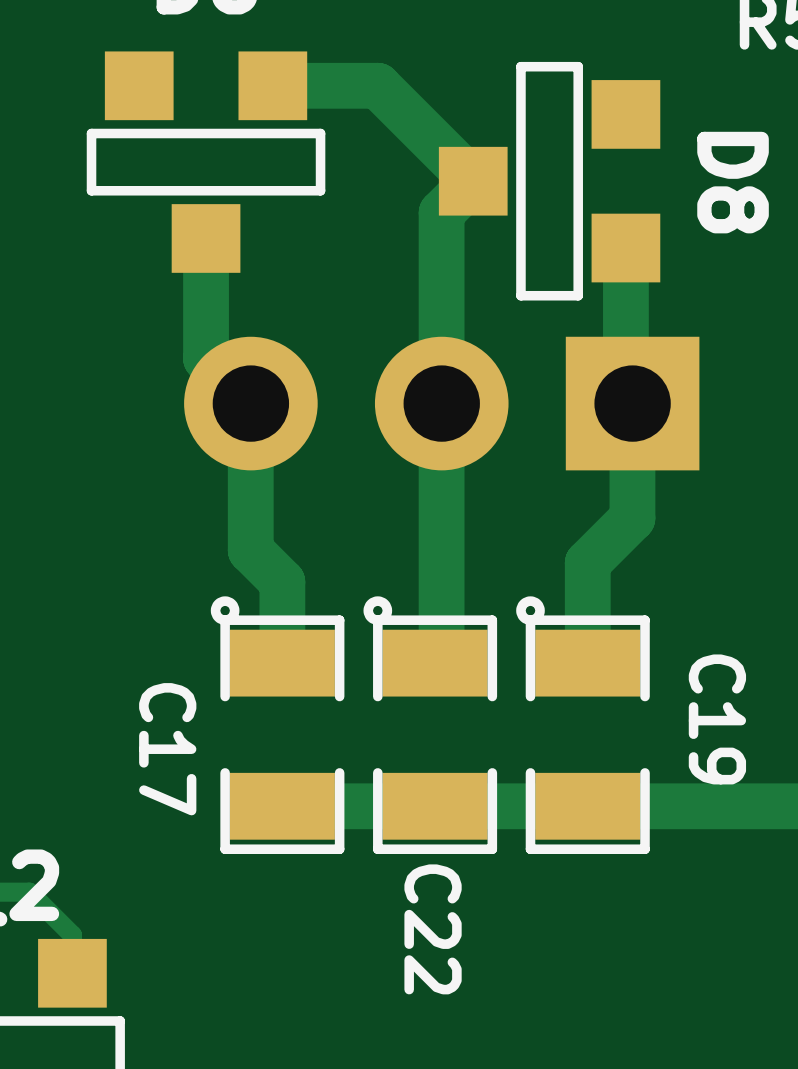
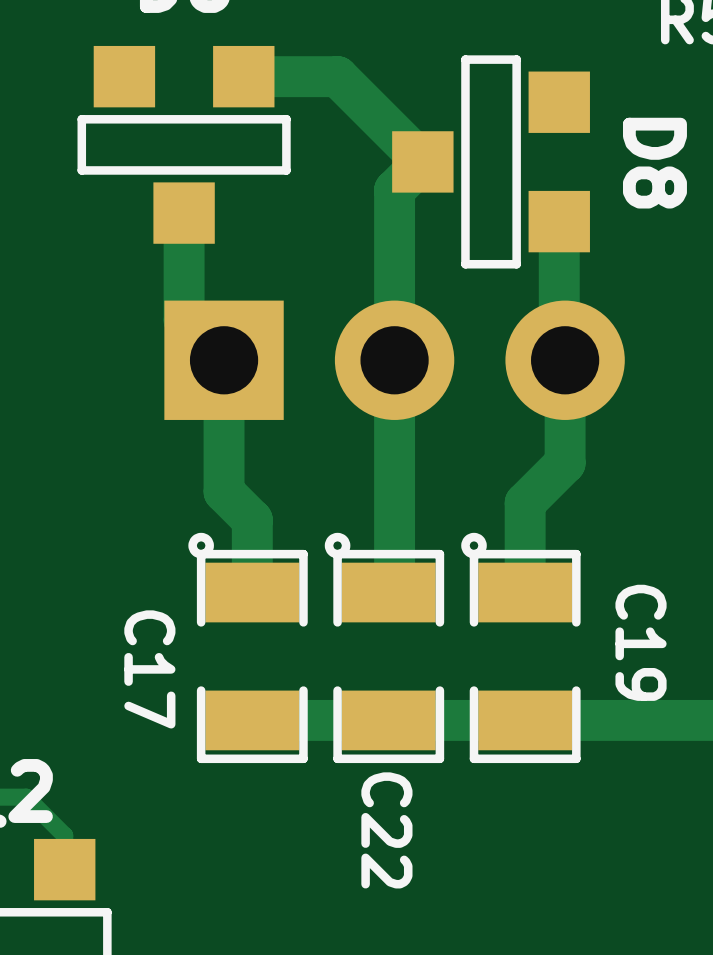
part rotation: 0° (441, 403) -> 180° (394, 360)

